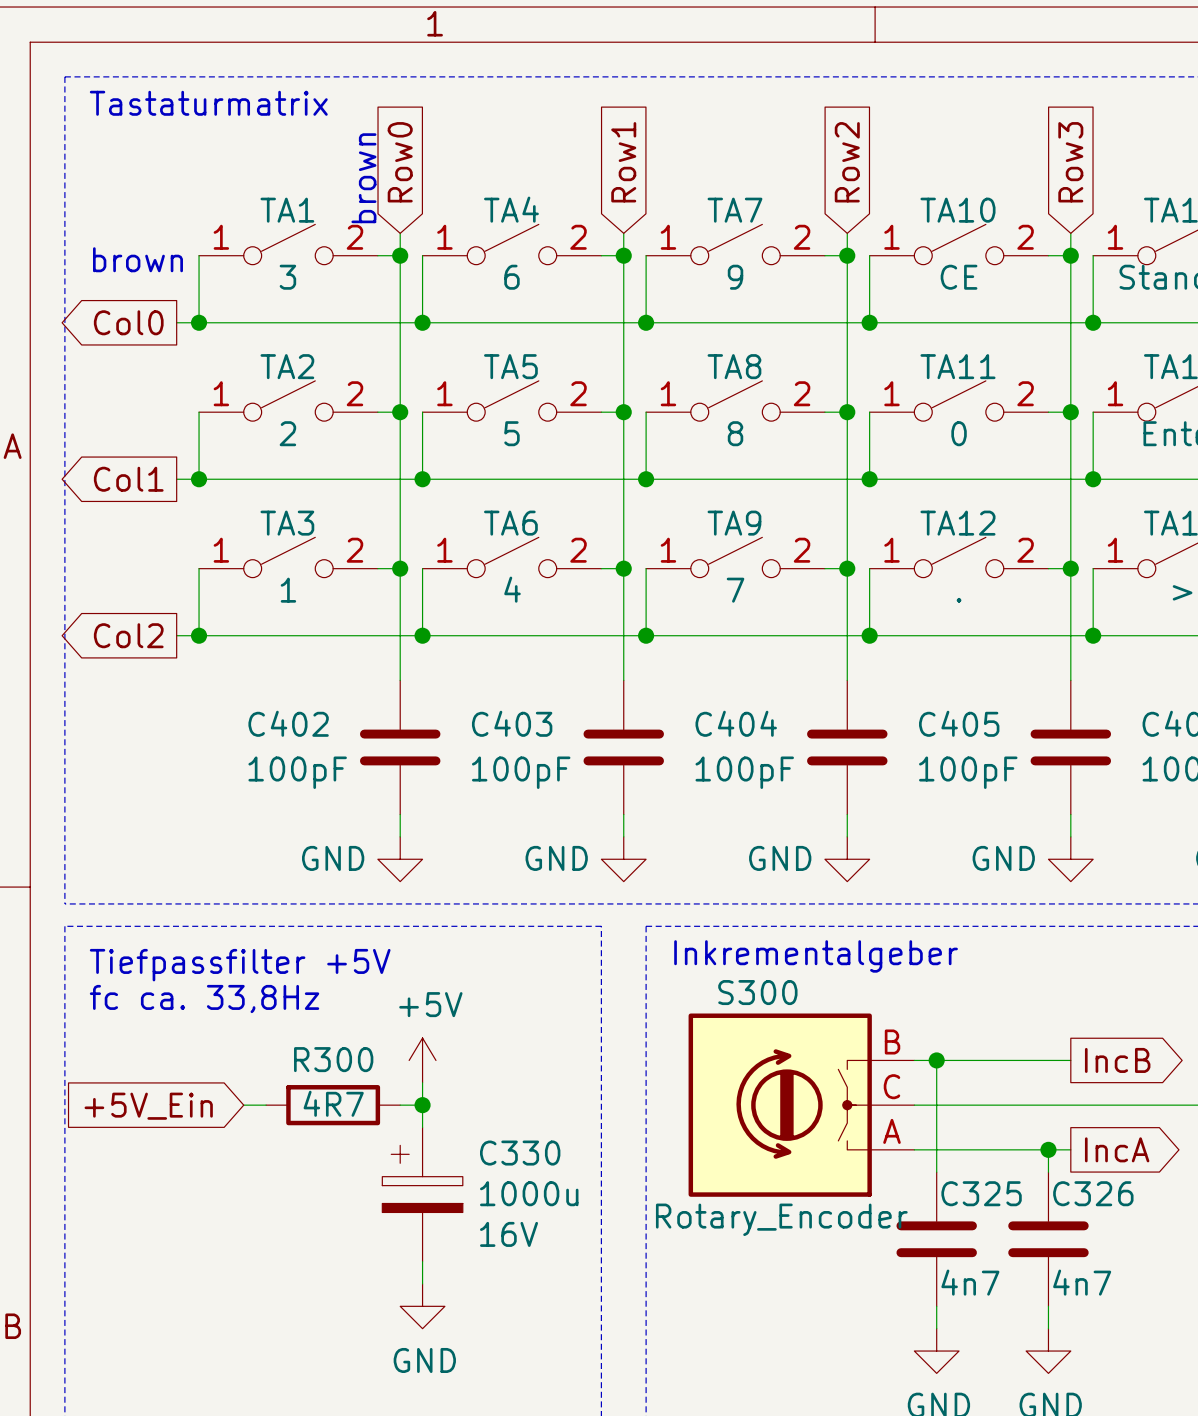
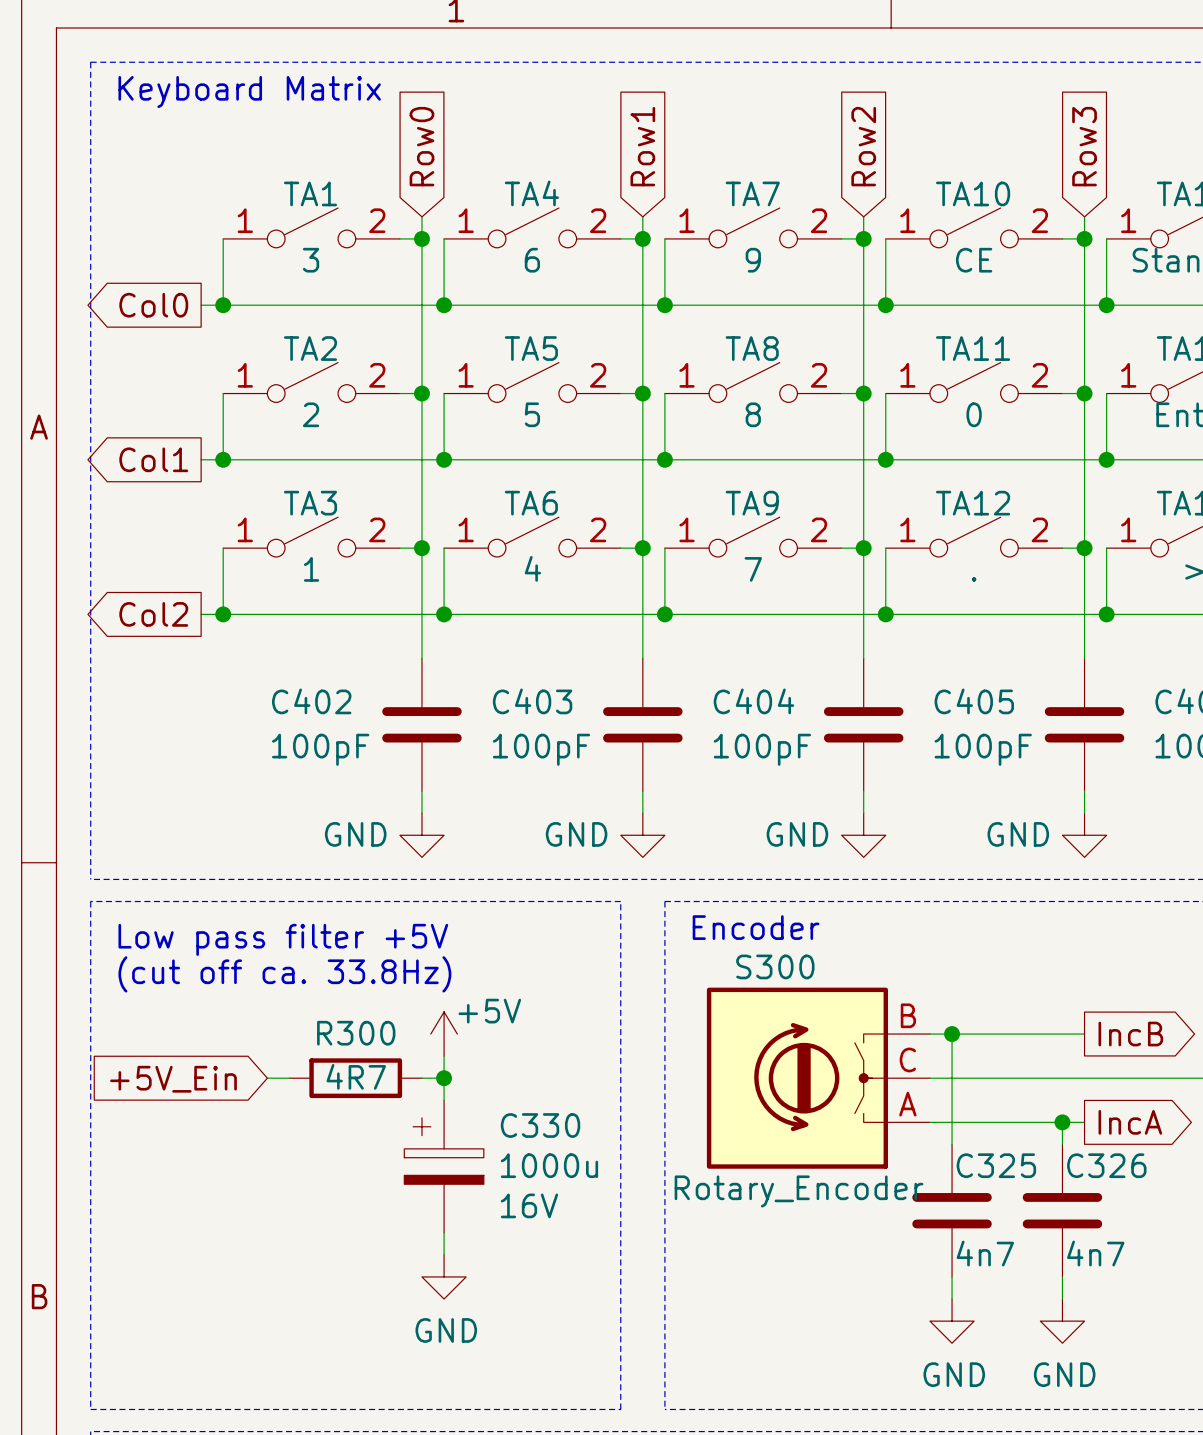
text: Tastaturmatrix (208, 103) -> Keyboard Matrix (249, 92)
text: brown (363, 178) -> none
text: brown (137, 259) -> none
text: Inkrementalgeber (816, 956) -> Encoder (756, 927)
text: Tiefpassfilter +5V (240, 965) -> Low pass filter +5V (283, 939)
text: fc ca. 33,8Hz (204, 999) -> (cut off ca. 33.8Hz) (284, 974)
power symbol text position: +5V (430, 1004) -> +5V (489, 1011)

